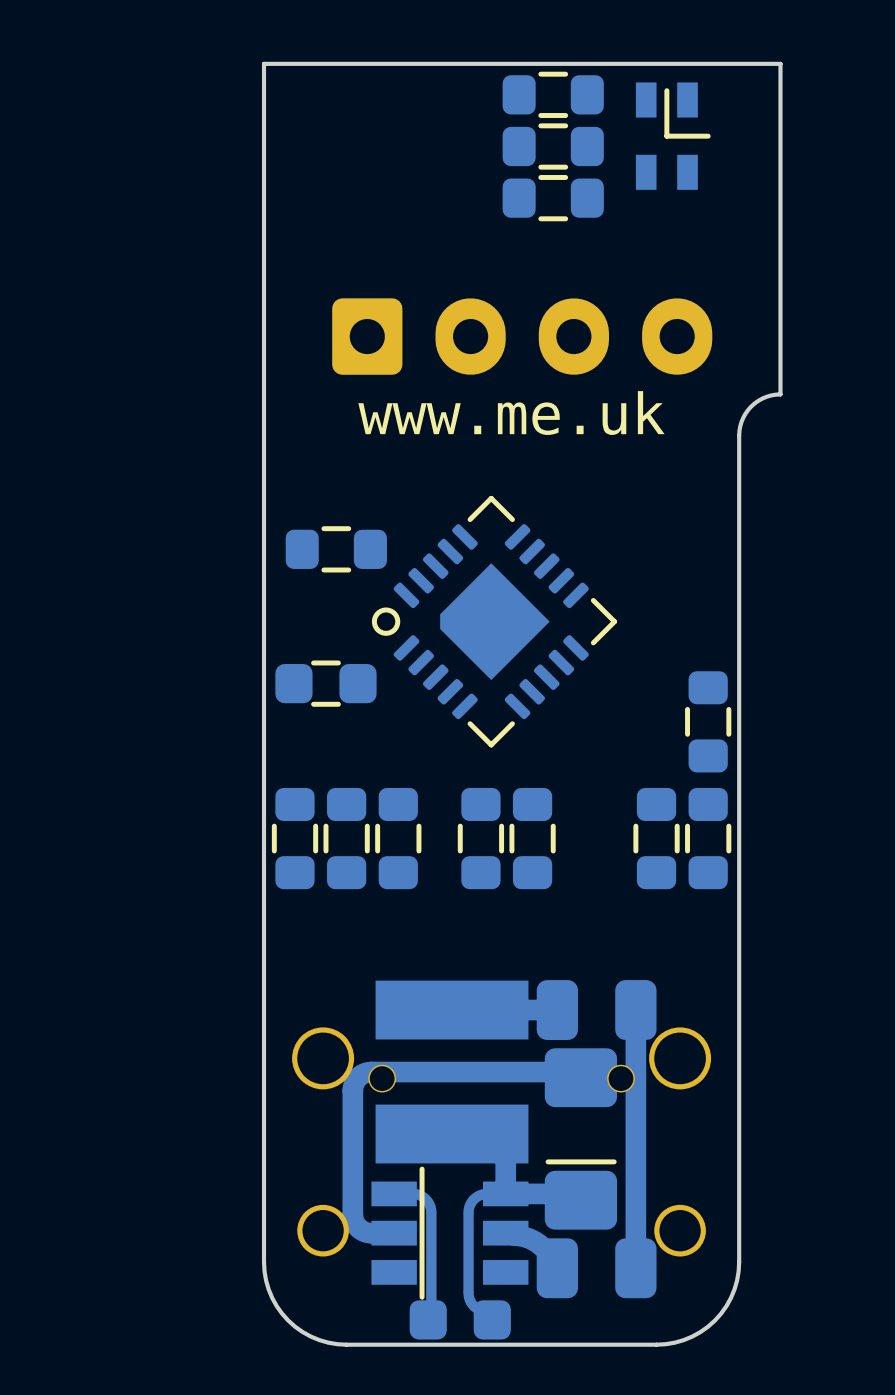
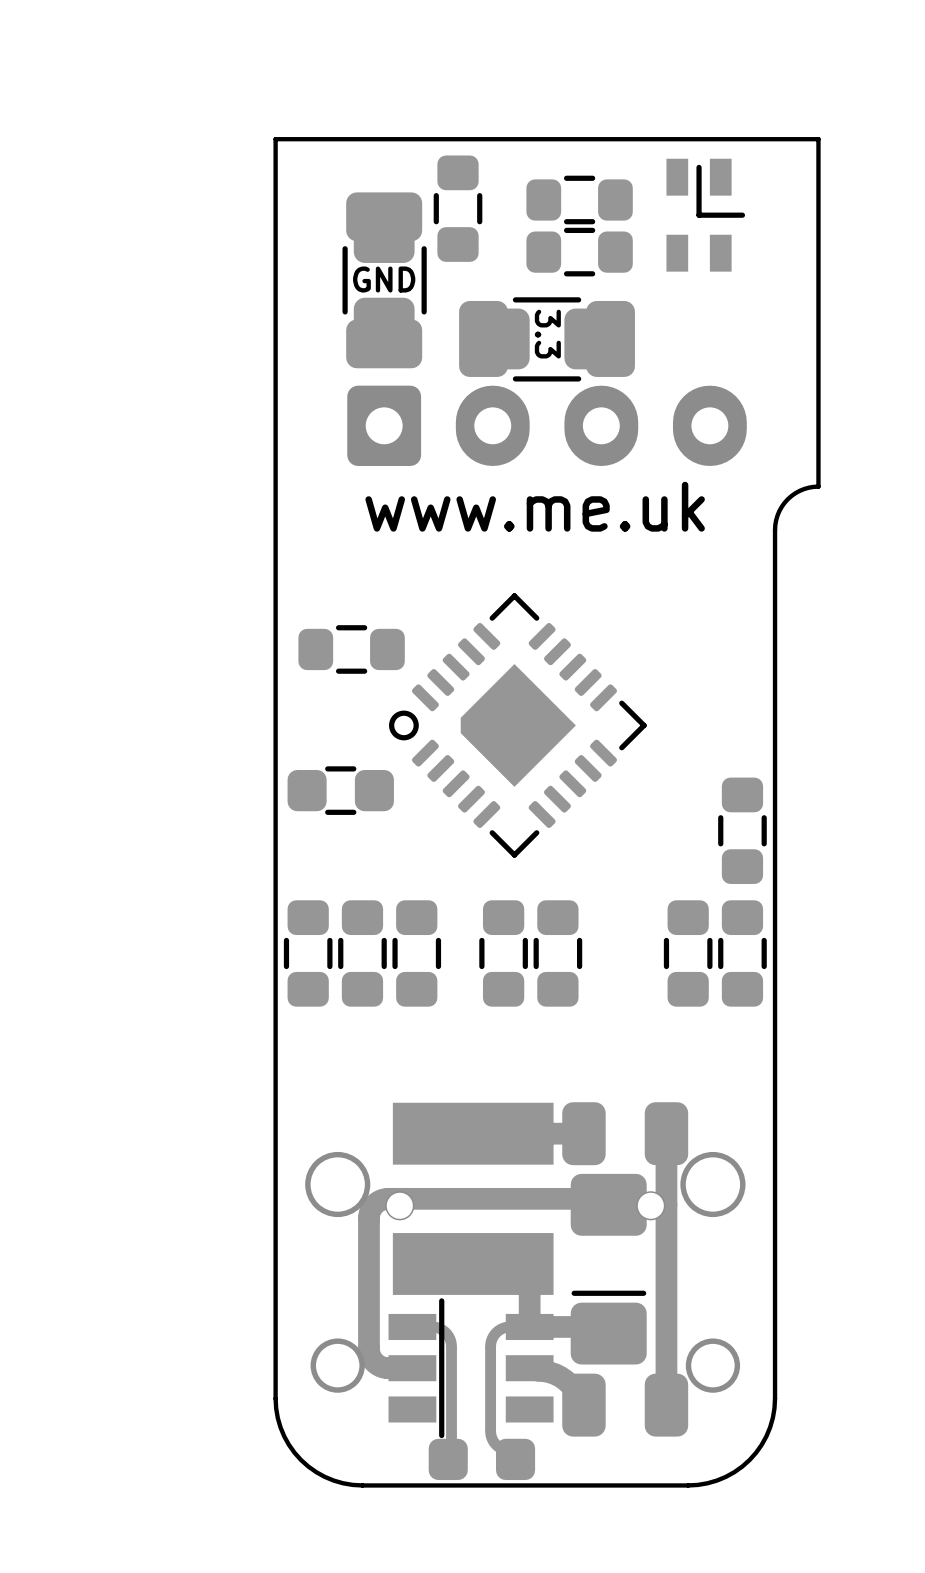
part: (553, 94) -> none
part: none -> (579, 199)
part: none -> (458, 208)
part: (553, 146) -> none
part: none -> (579, 252)
text: none -> GND (384, 279)
part: none -> (384, 280)
part: (553, 198) -> none
text: none -> 3.3 (547, 334)
part: none -> (547, 339)

